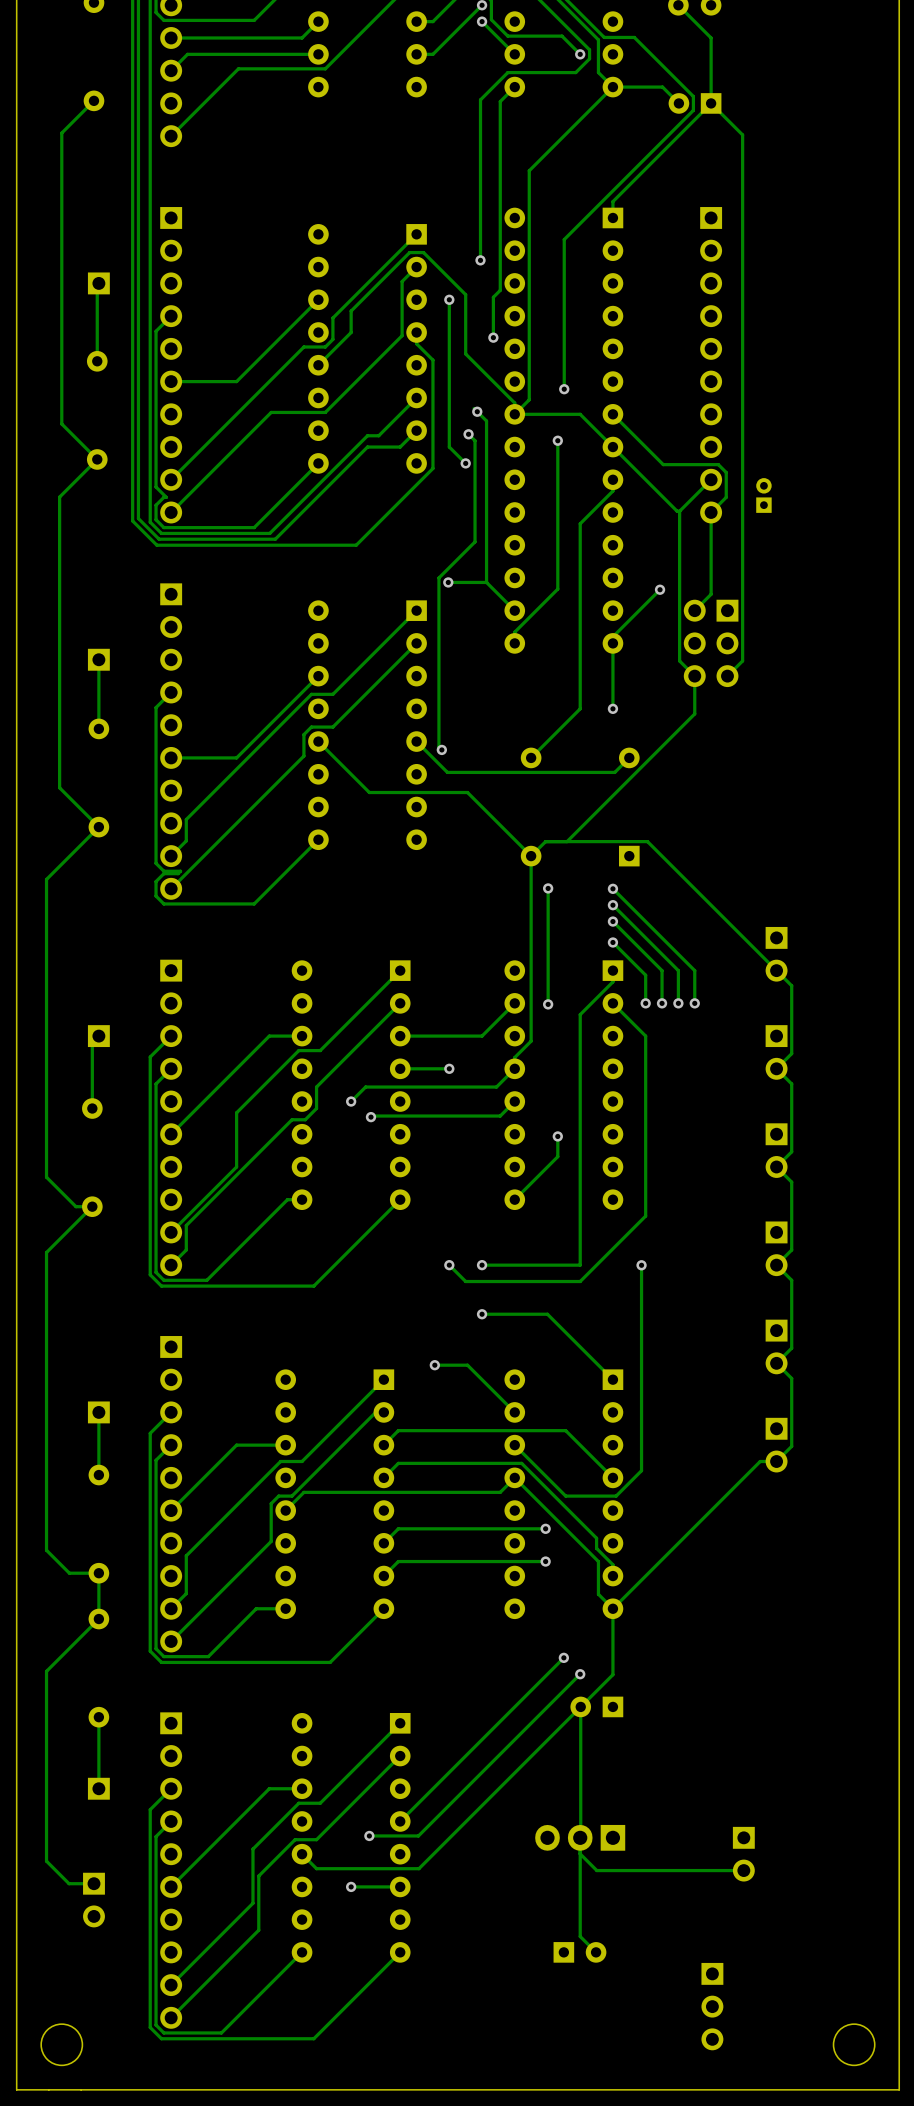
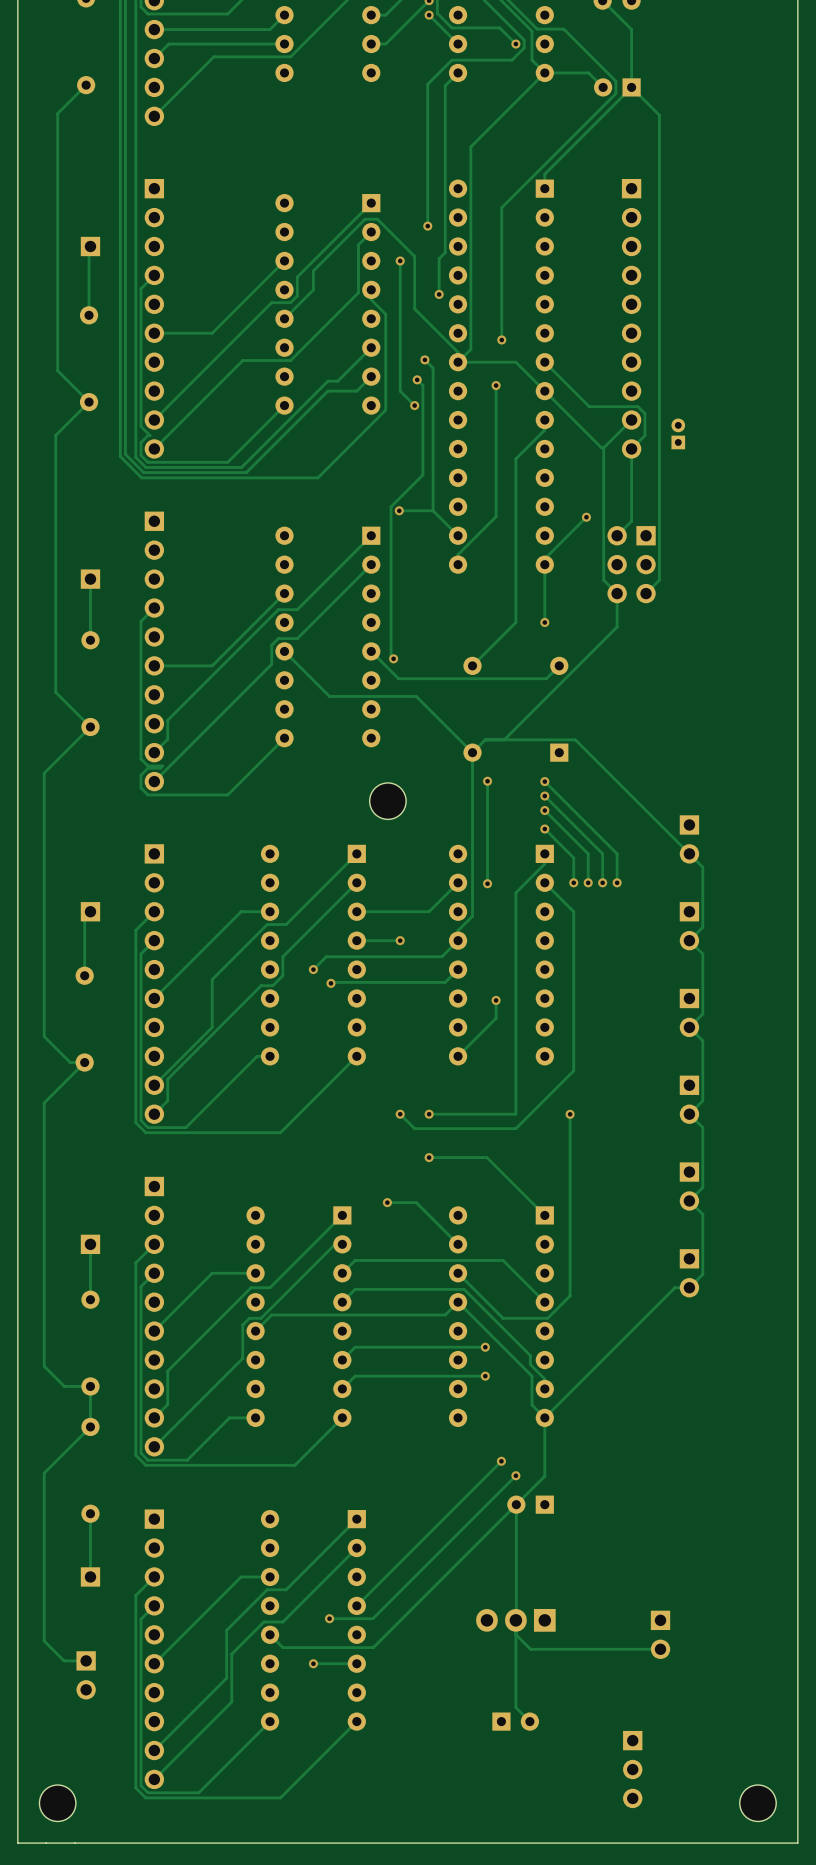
part: none -> (387, 801)

